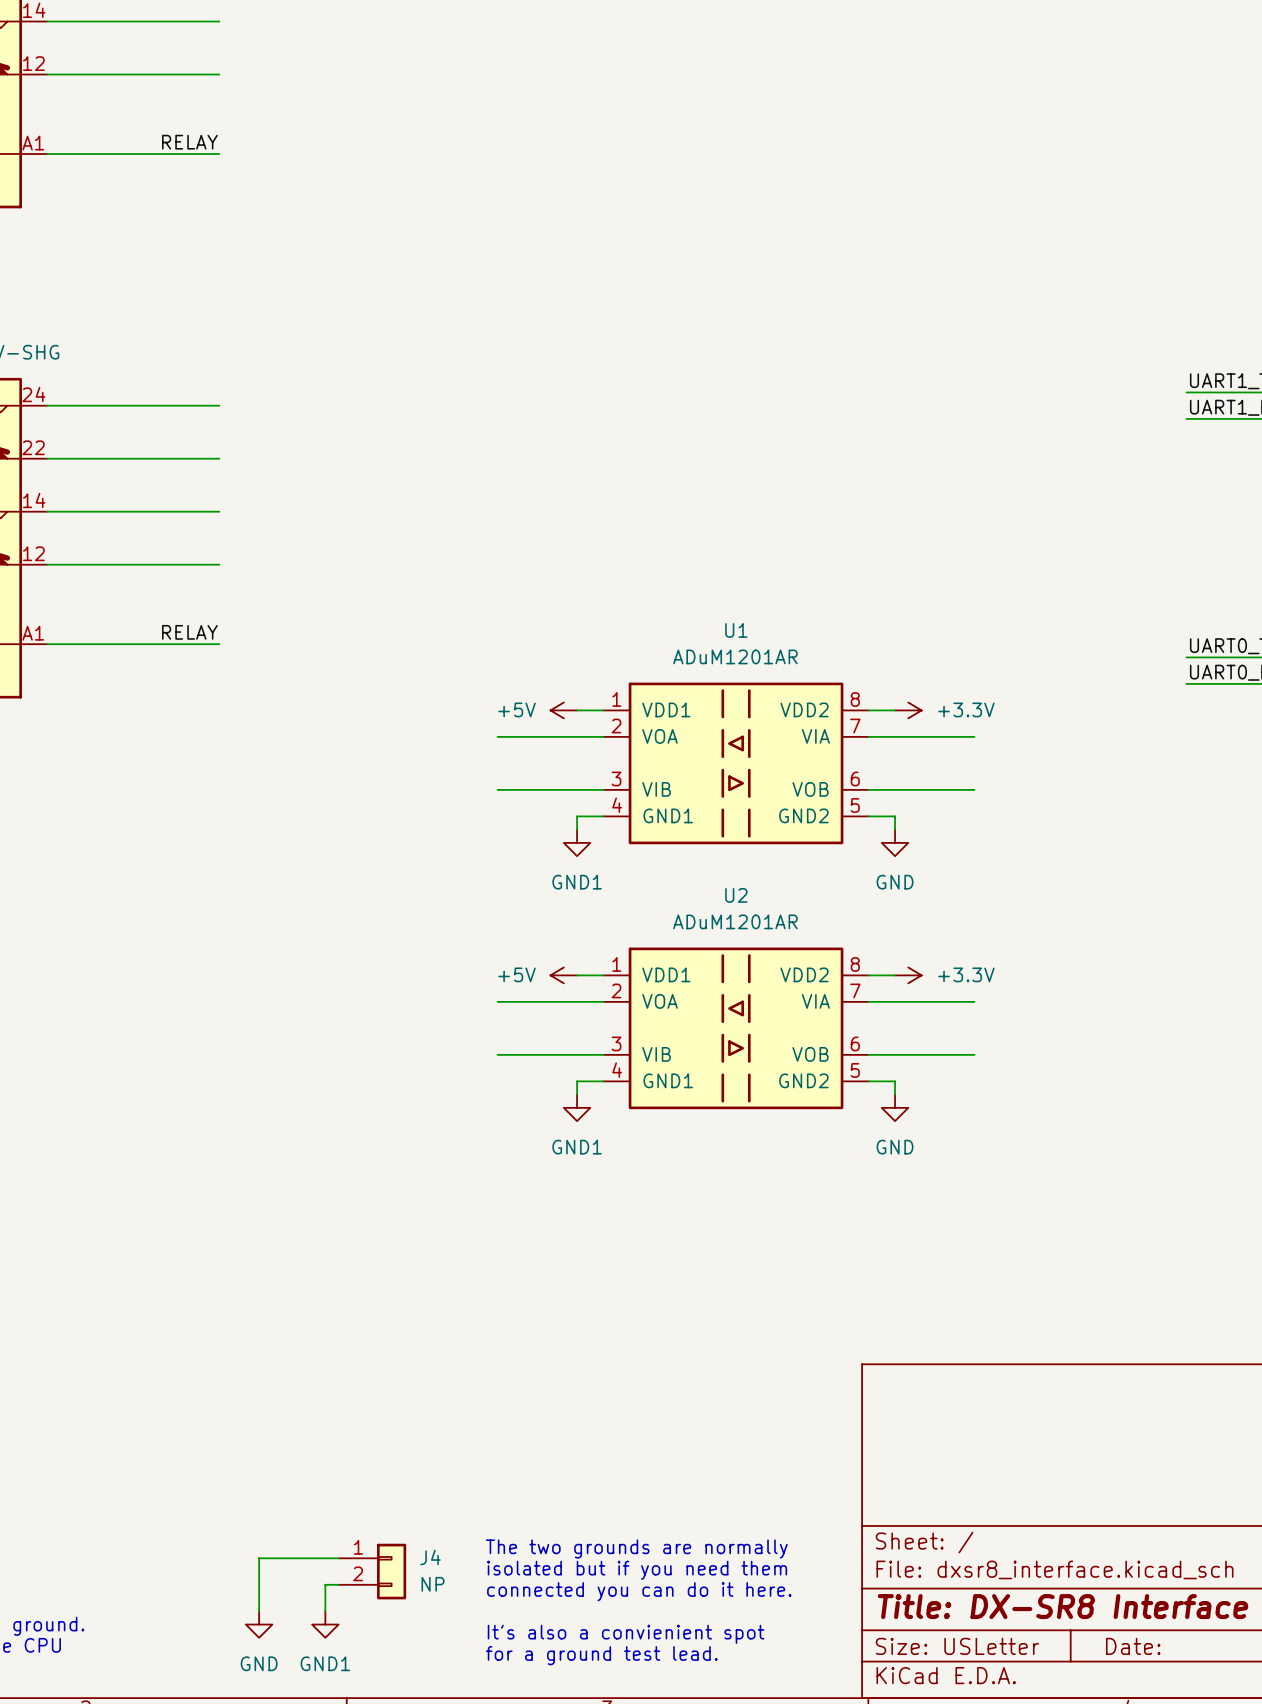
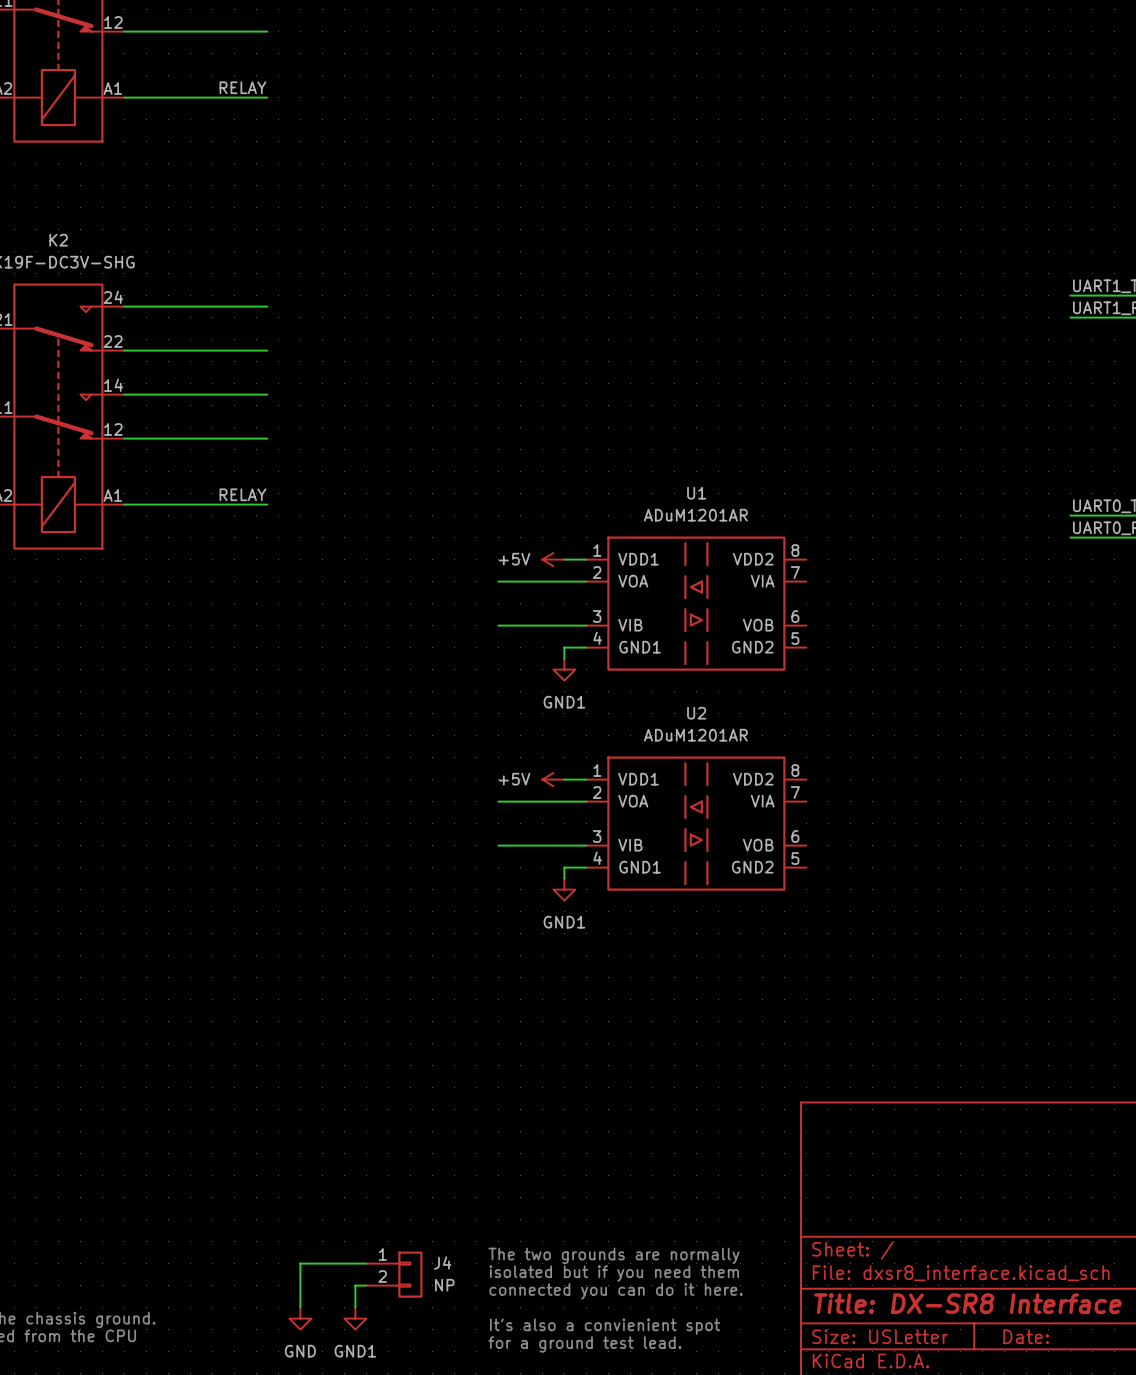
wire: (868, 710) (895, 710) -> none
power symbol: +3.3V (908, 710) -> none
wire: (868, 736) (974, 736) -> none
wire: (868, 789) (974, 789) -> none
wire: (868, 816) (895, 816) (895, 829) -> none
power symbol: GND (895, 842) -> none
wire: (868, 975) (895, 975) -> none
power symbol: +3.3V (908, 975) -> none
wire: (868, 1001) (974, 1001) -> none
wire: (868, 1054) (974, 1054) -> none
wire: (868, 1081) (895, 1081) (895, 1094) -> none
power symbol: GND (895, 1107) -> none

